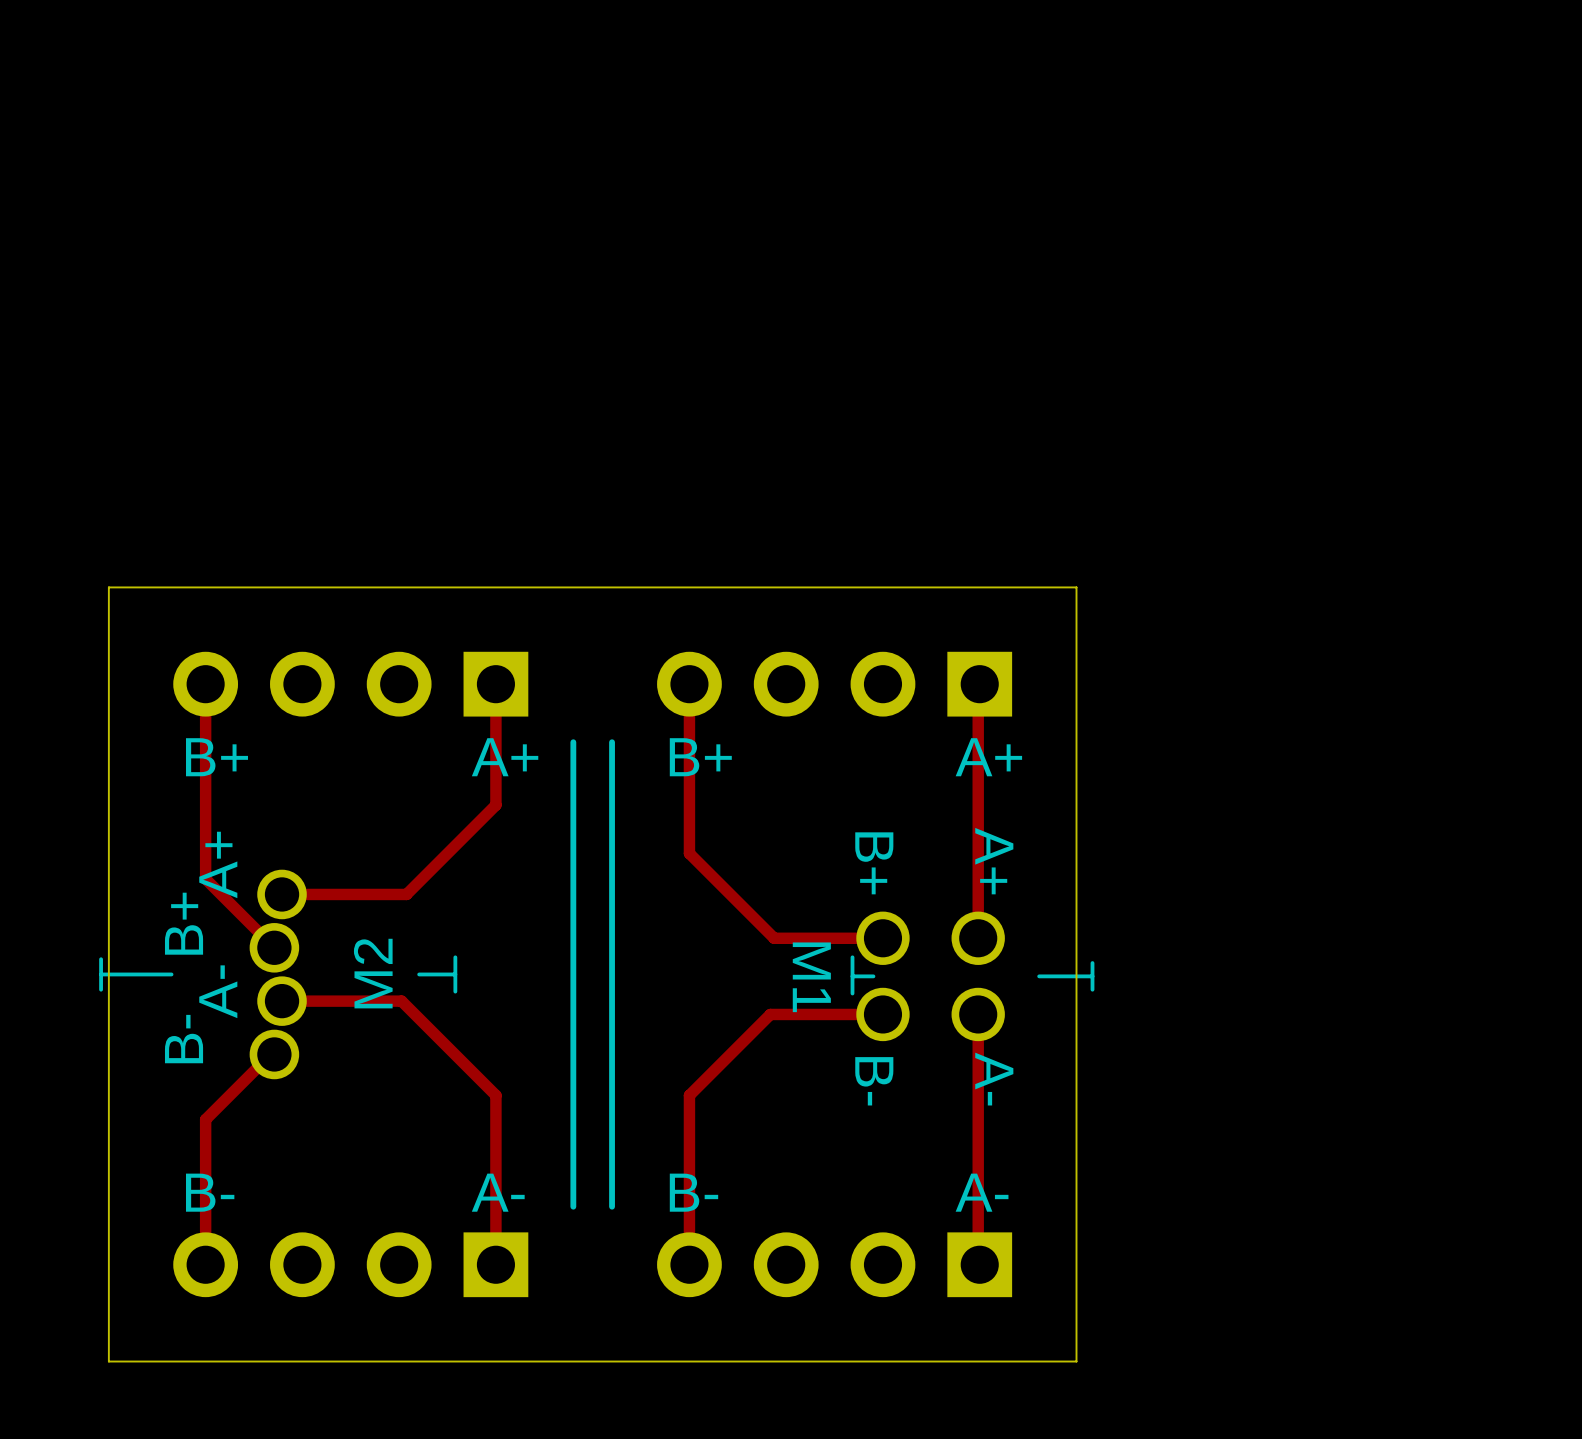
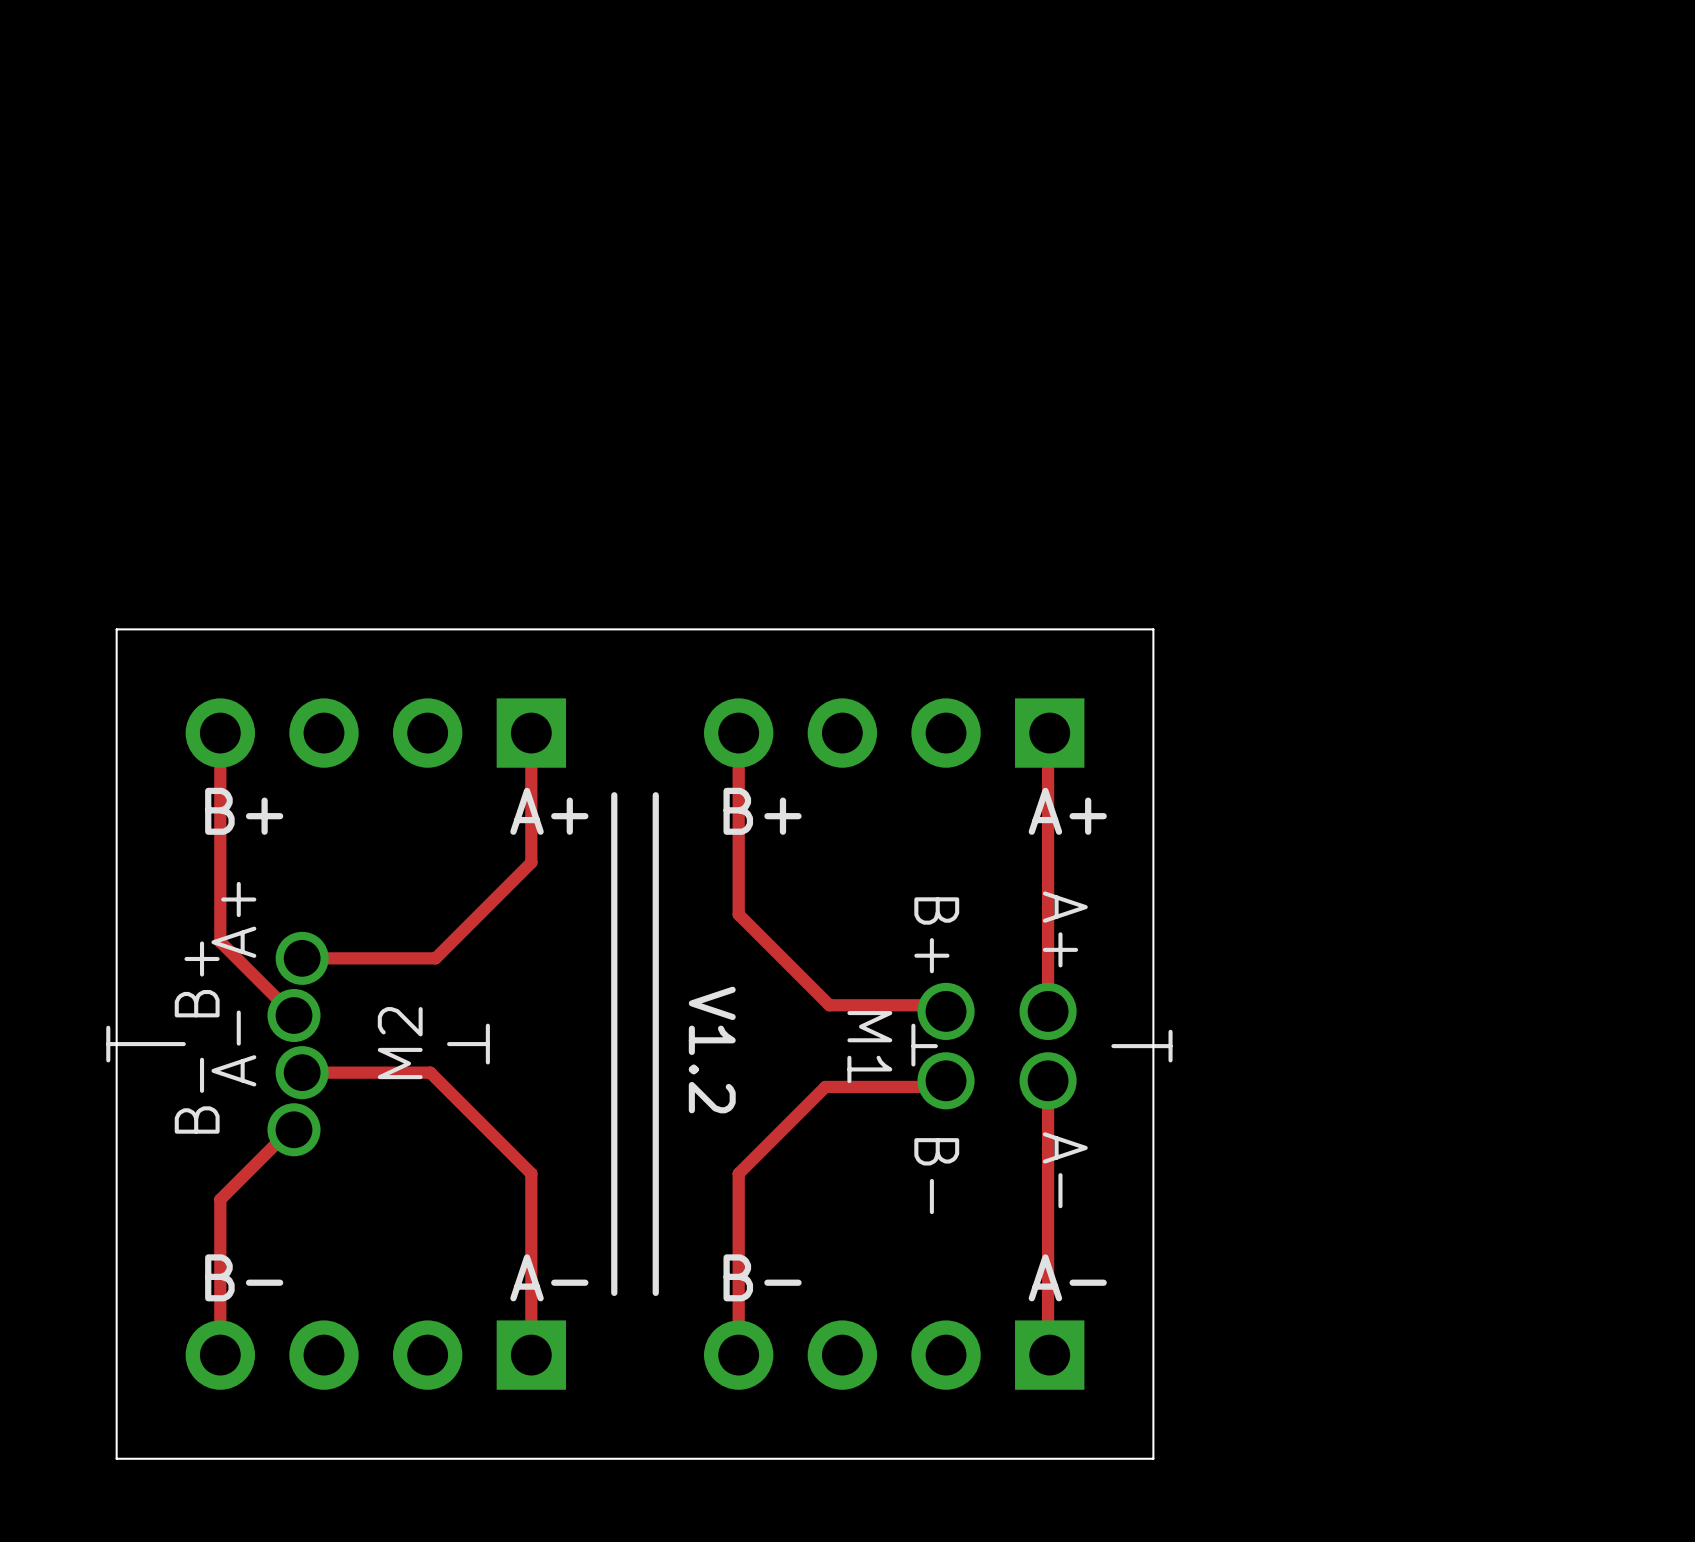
M1 footprint: [850, 911, 1095, 1042] -> [911, 982, 1173, 1110]
text: none -> V1.2 (712, 1050)

